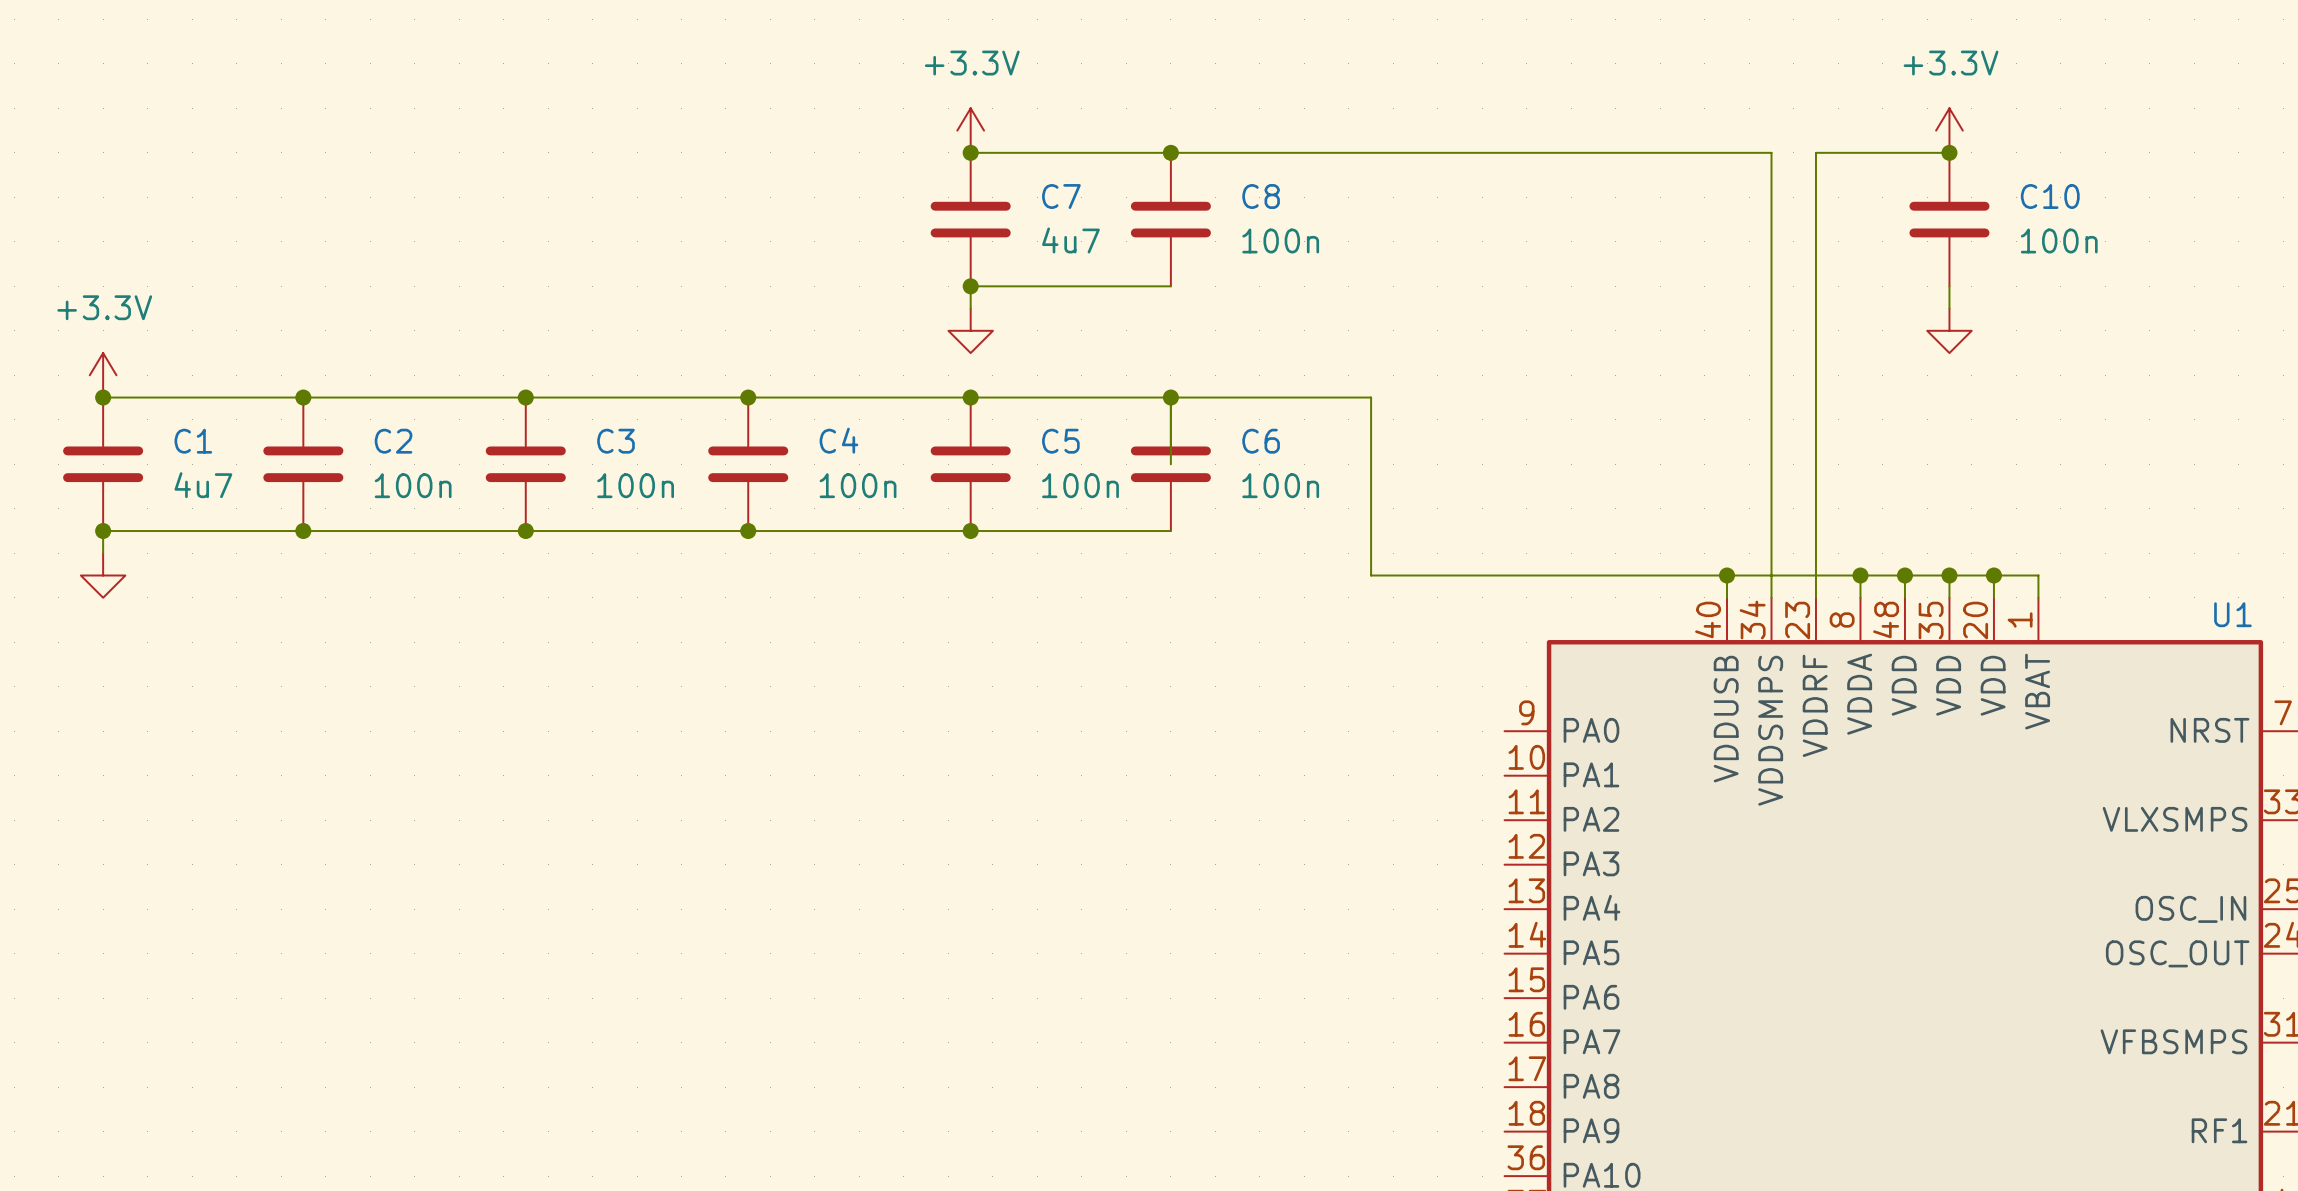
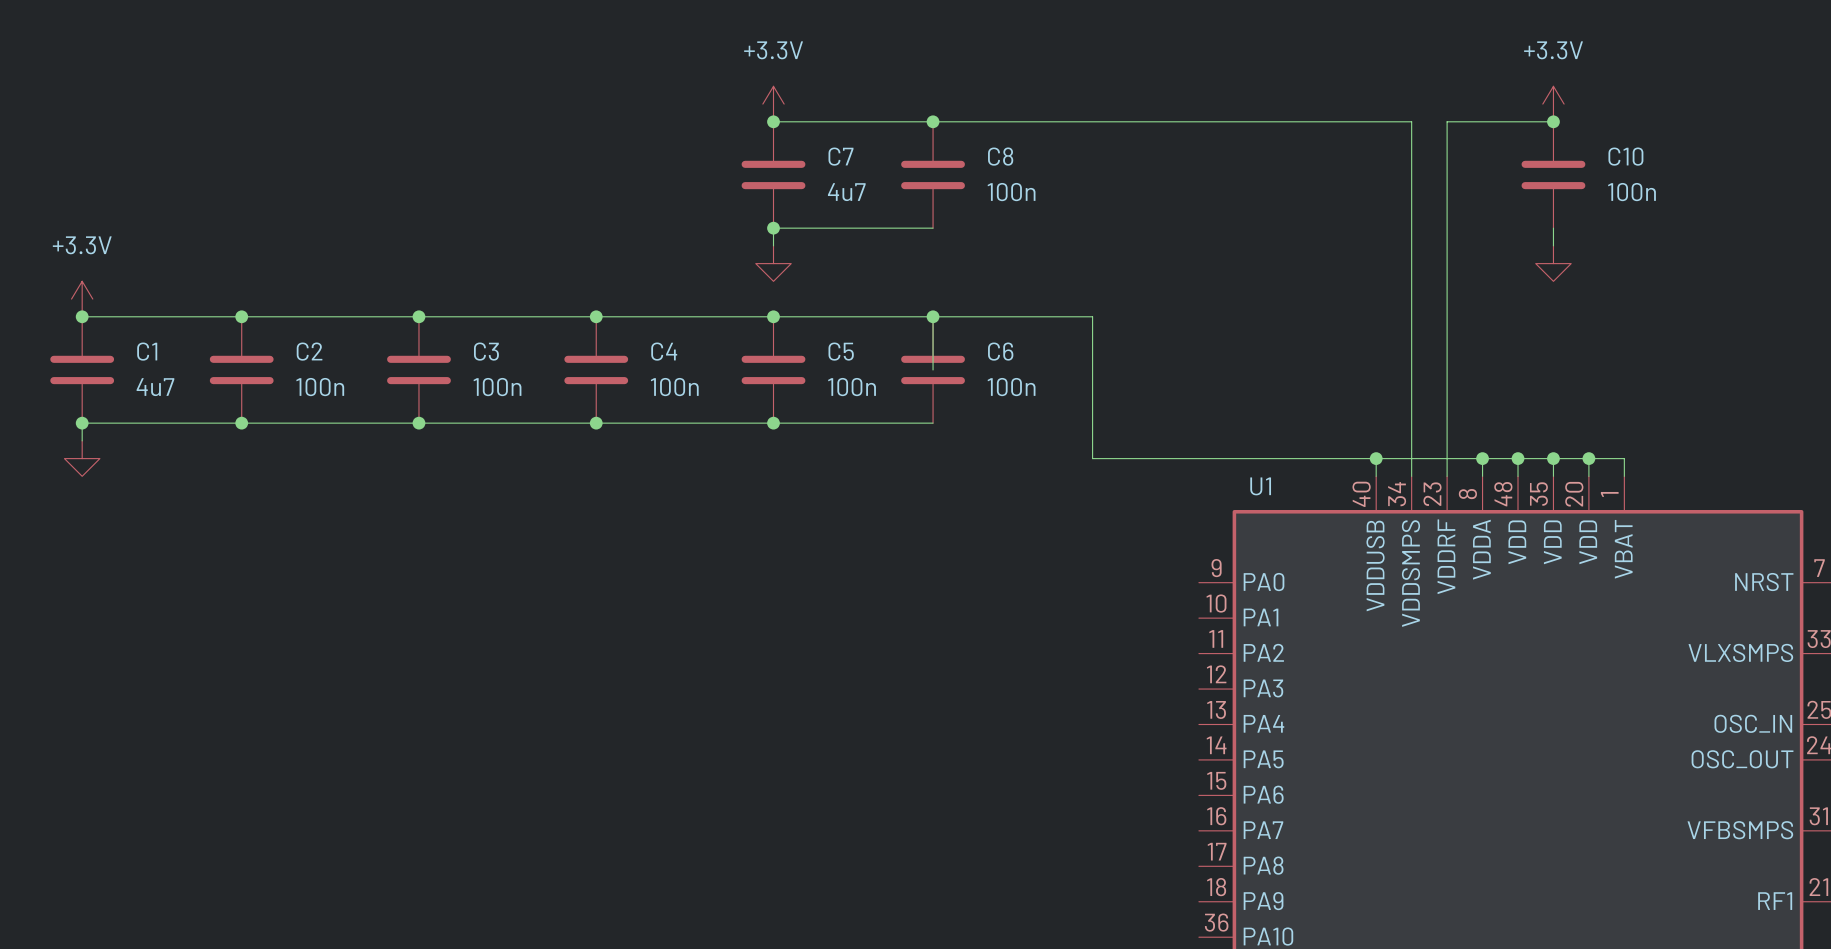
U1 name position: U1 (2232, 614) -> U1 (1260, 486)

